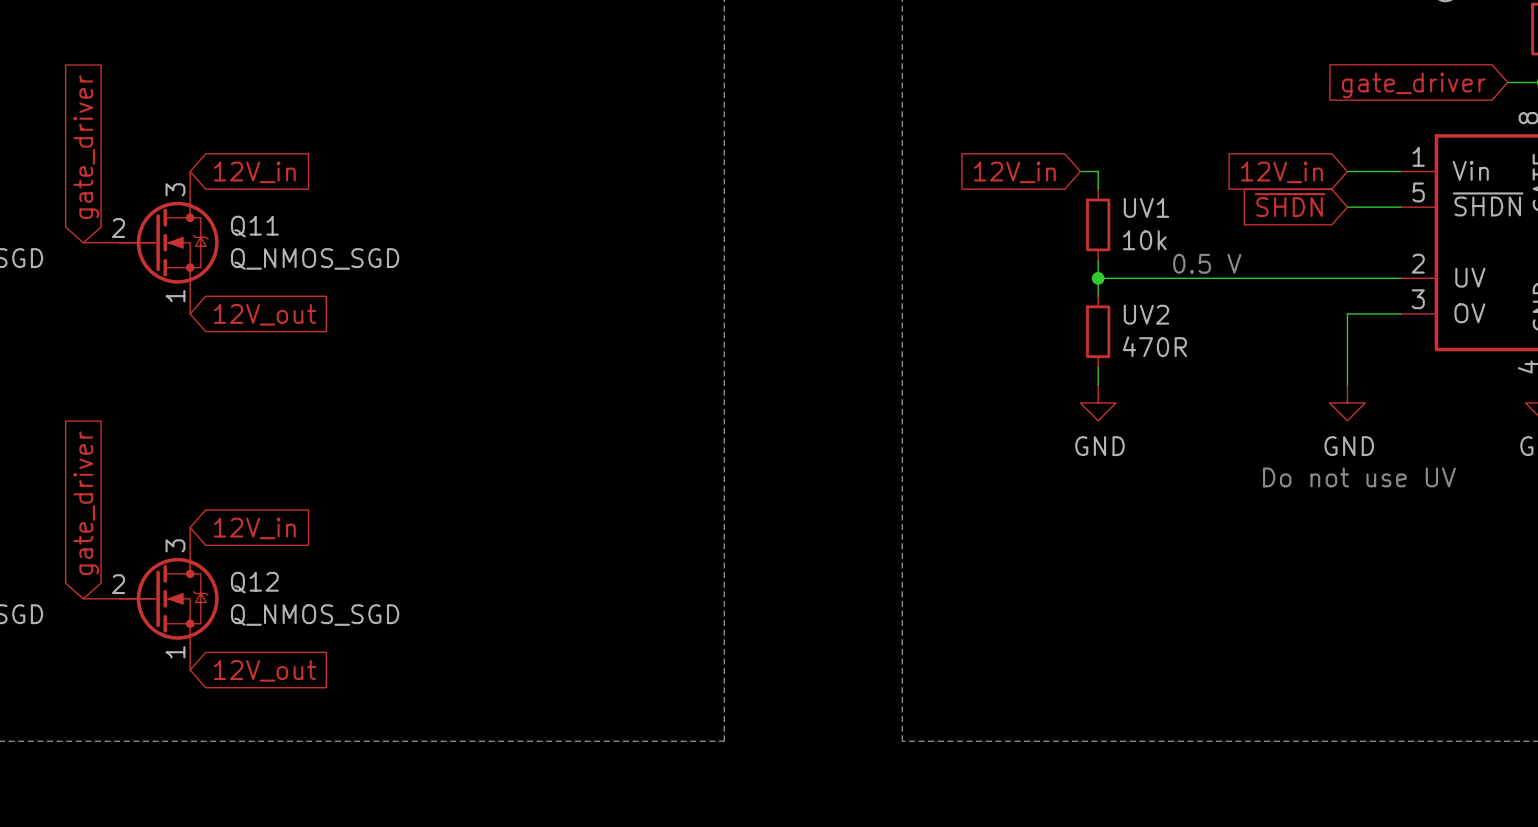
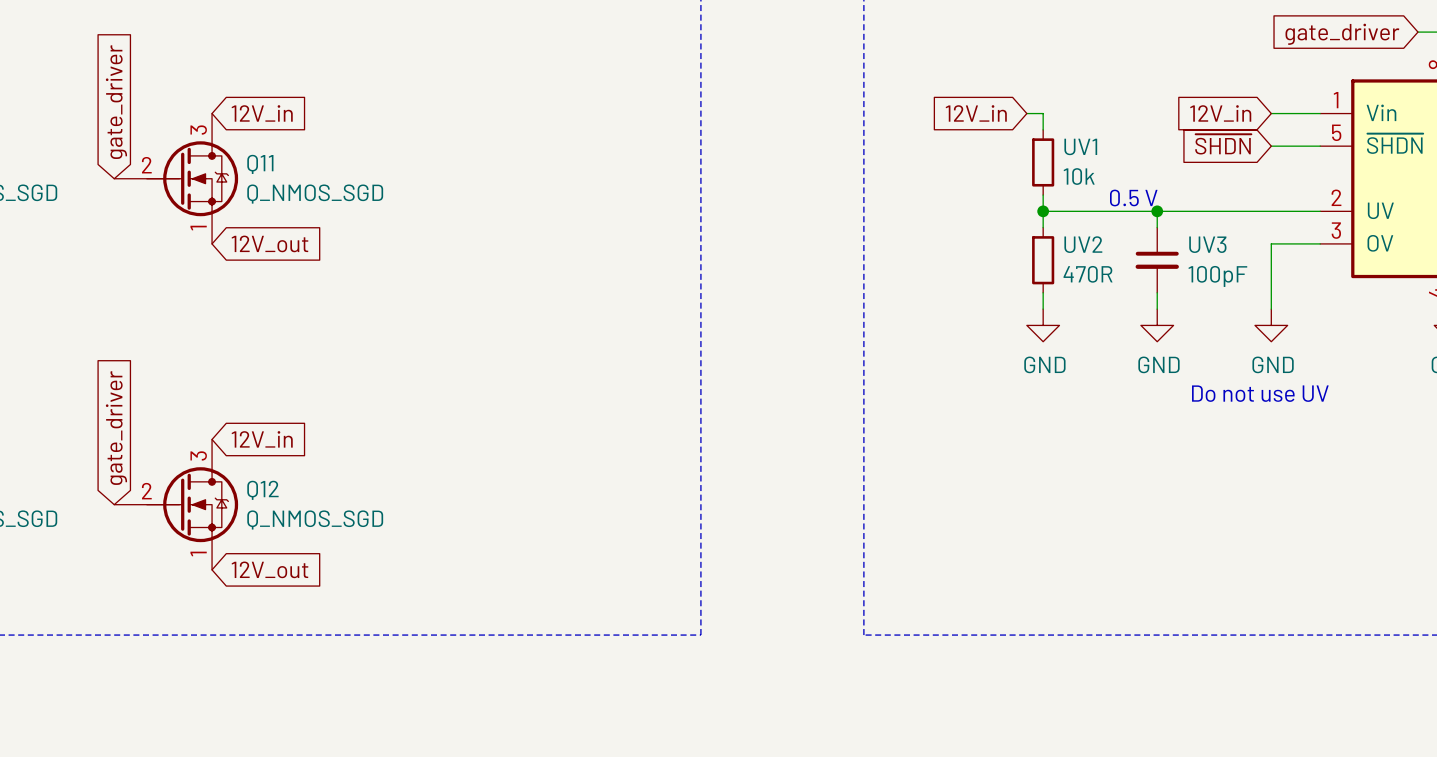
wire: none -> (1157, 211) (1157, 227)
junction: none -> (1157, 211)
UV3: none -> 100pF (1157, 260)
wire: none -> (1157, 292) (1157, 309)
power symbol: none -> GND (1157, 325)

